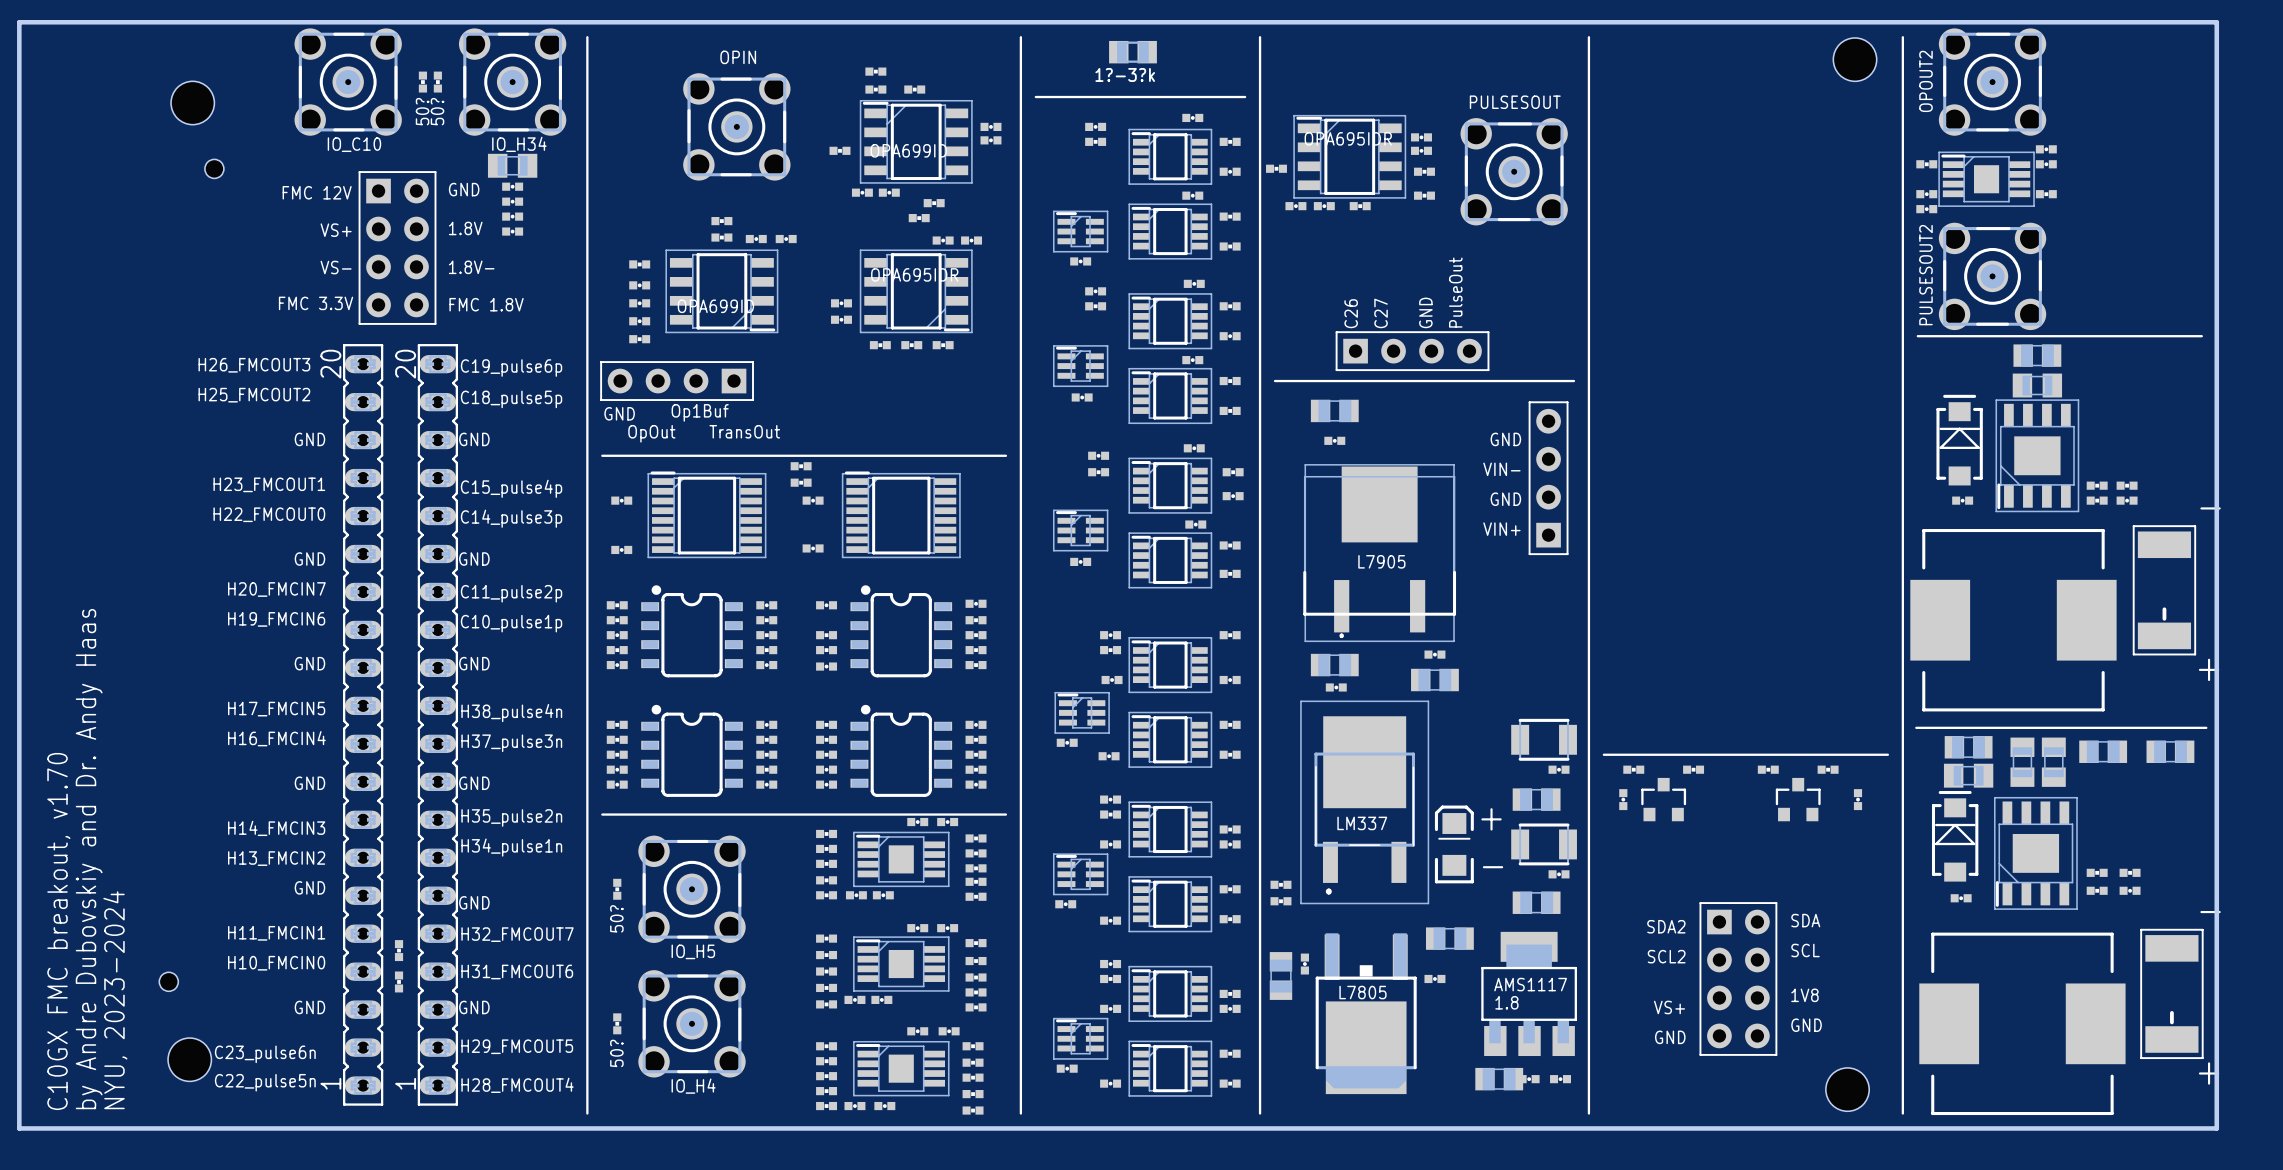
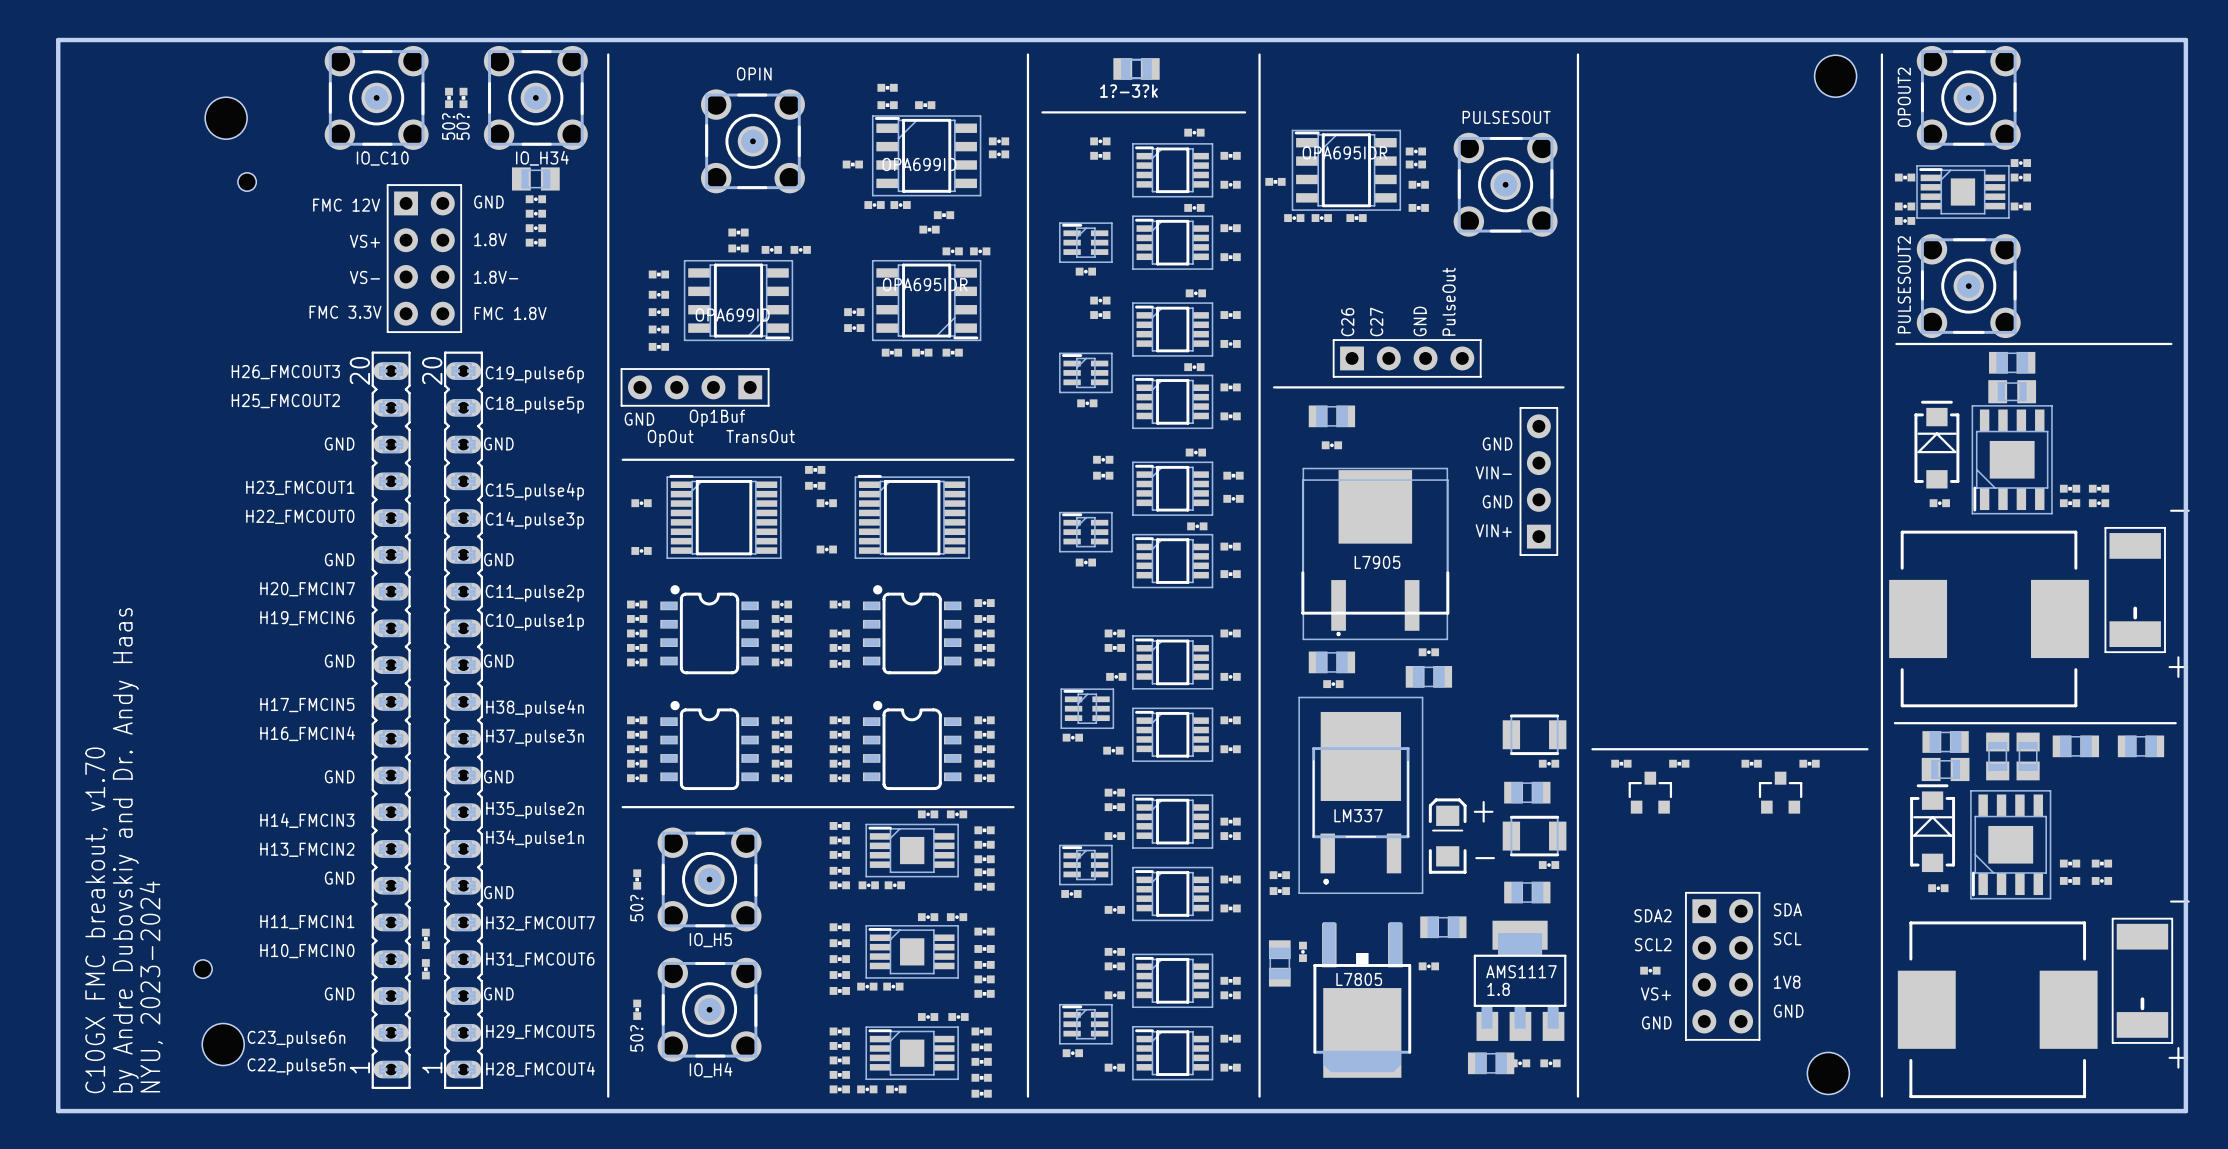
part: (1623, 799) -> none
part: (1858, 799) -> none
part: none -> (1650, 970)

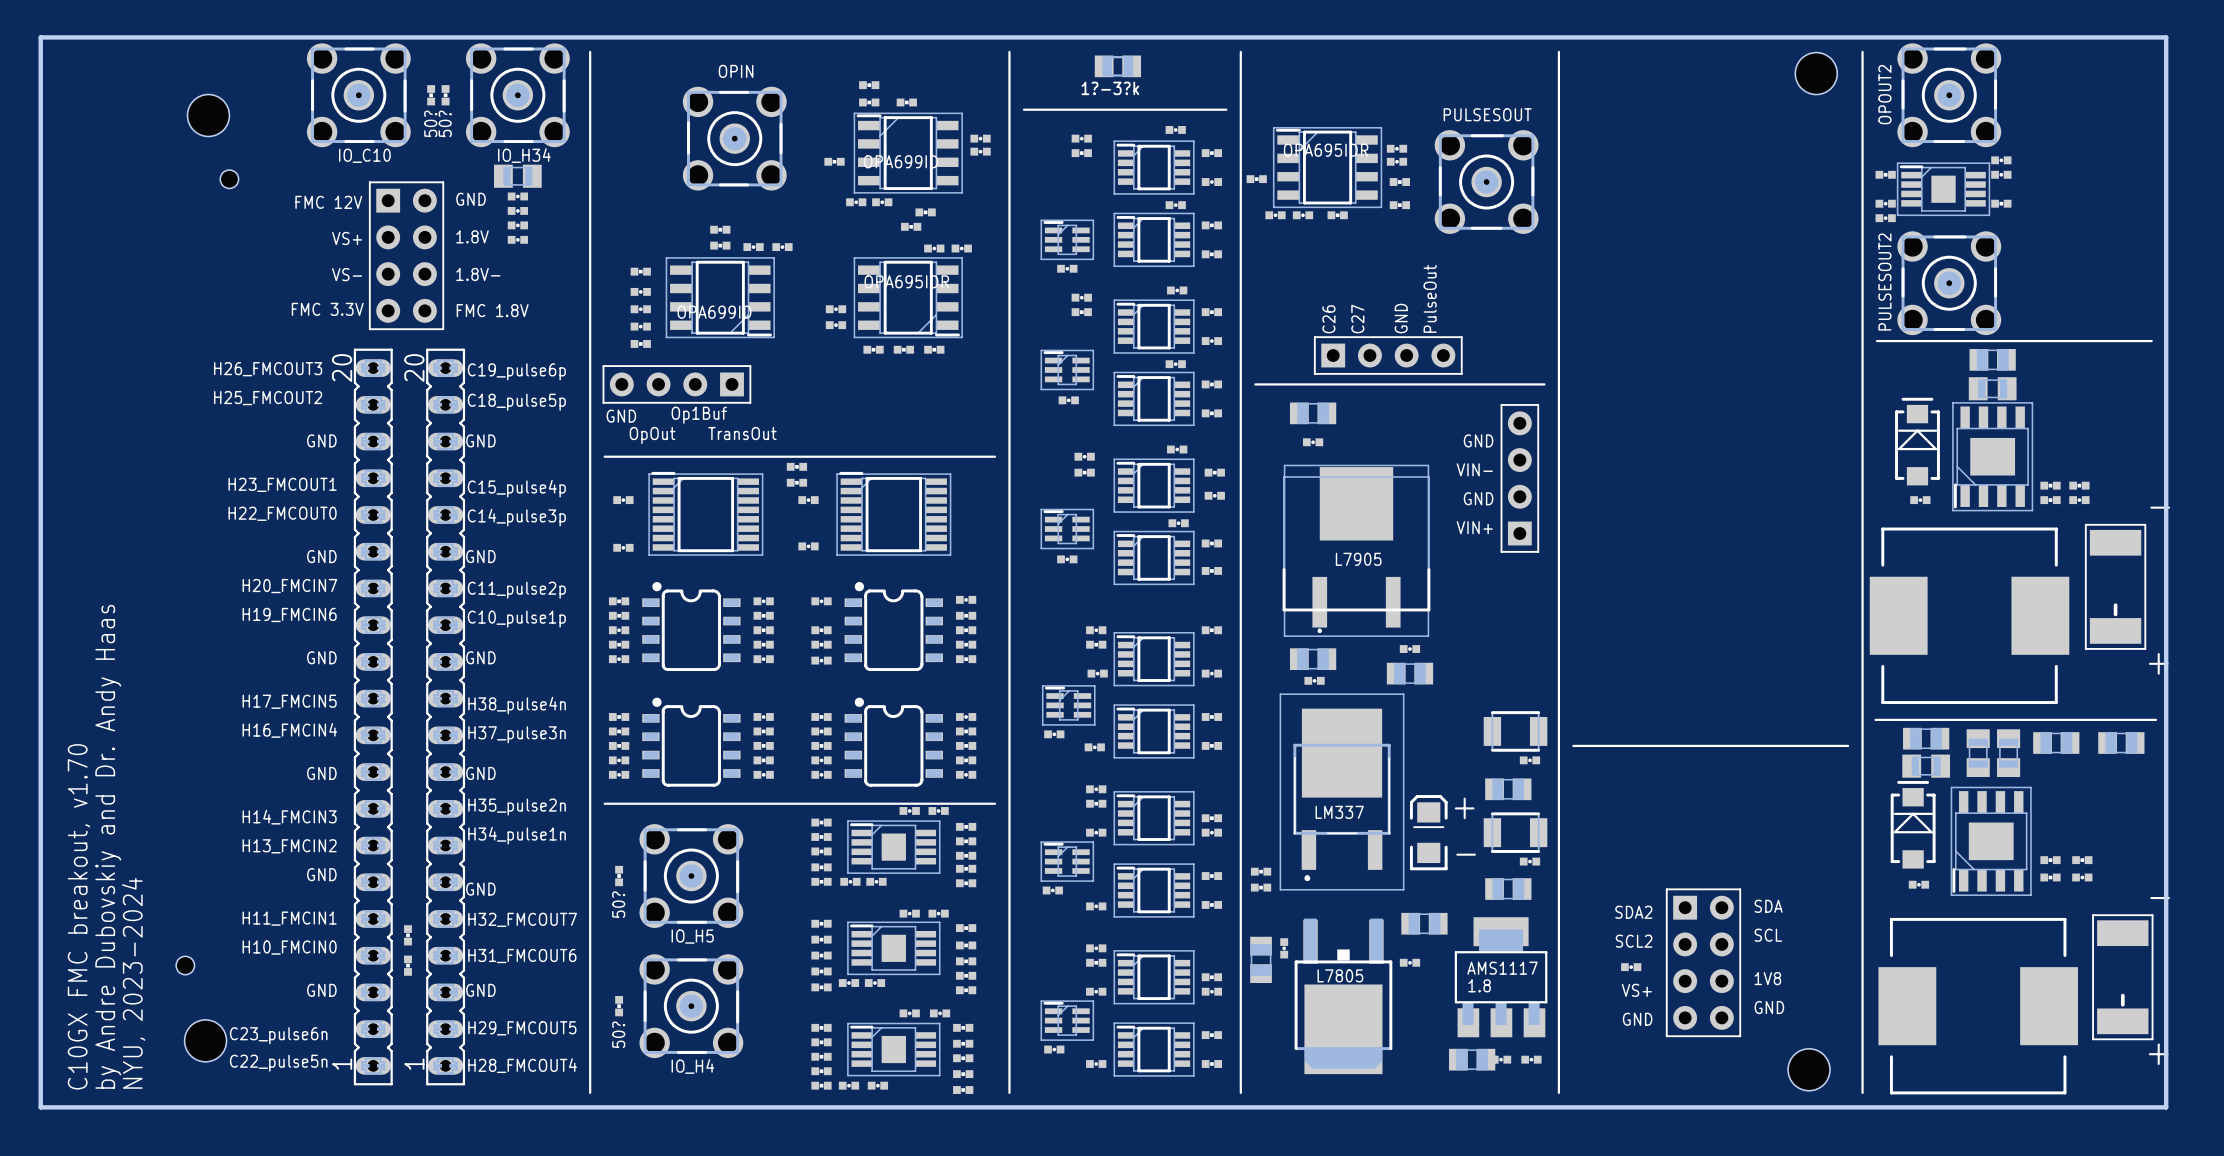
part: (1621, 763) -> none
part: (1679, 763) -> none
part: (1751, 763) -> none
part: (1809, 763) -> none
part: (1650, 792) -> none
part: (1780, 792) -> none

